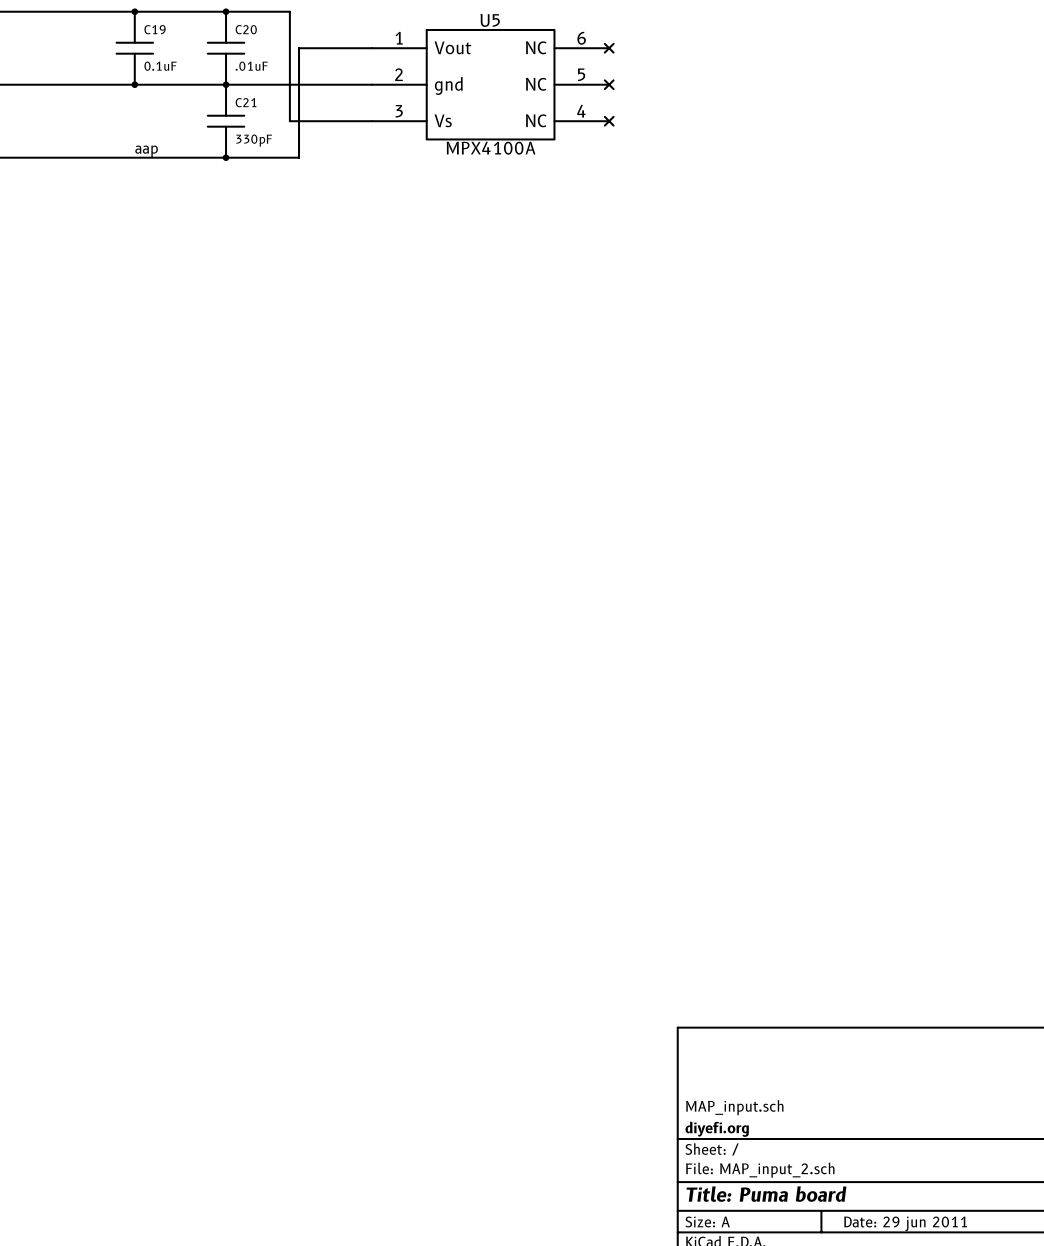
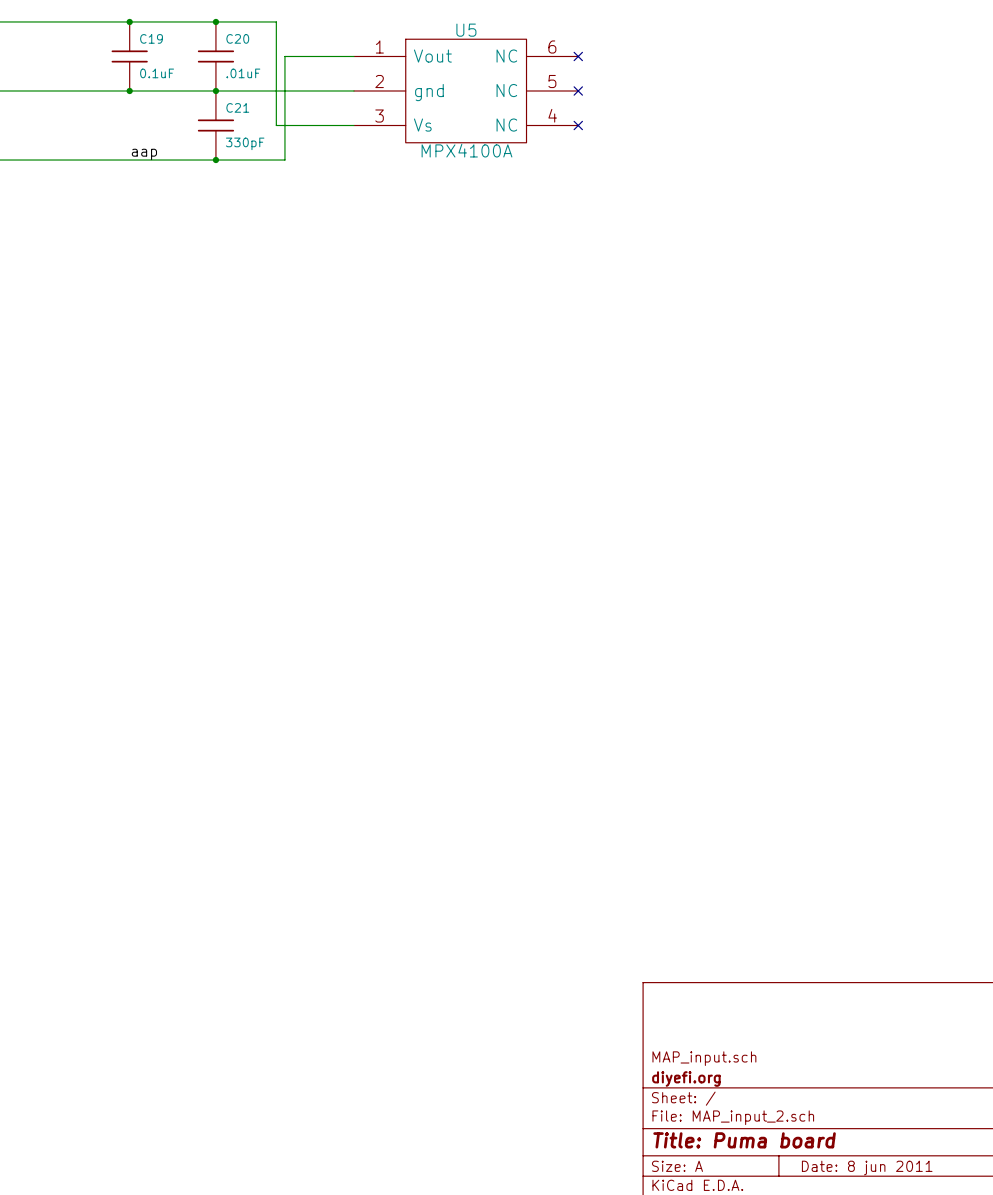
title block: Date: 29 jun 2011 (905, 1223) -> Date: 8 jun 2011 (867, 1168)

